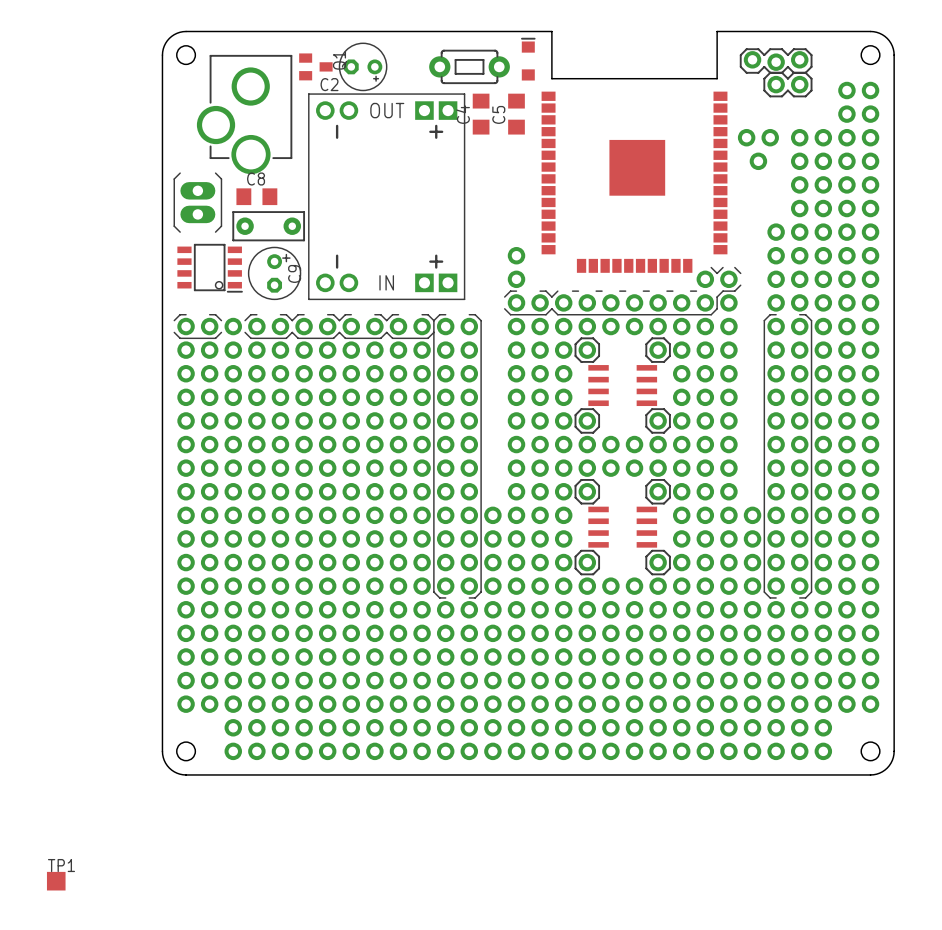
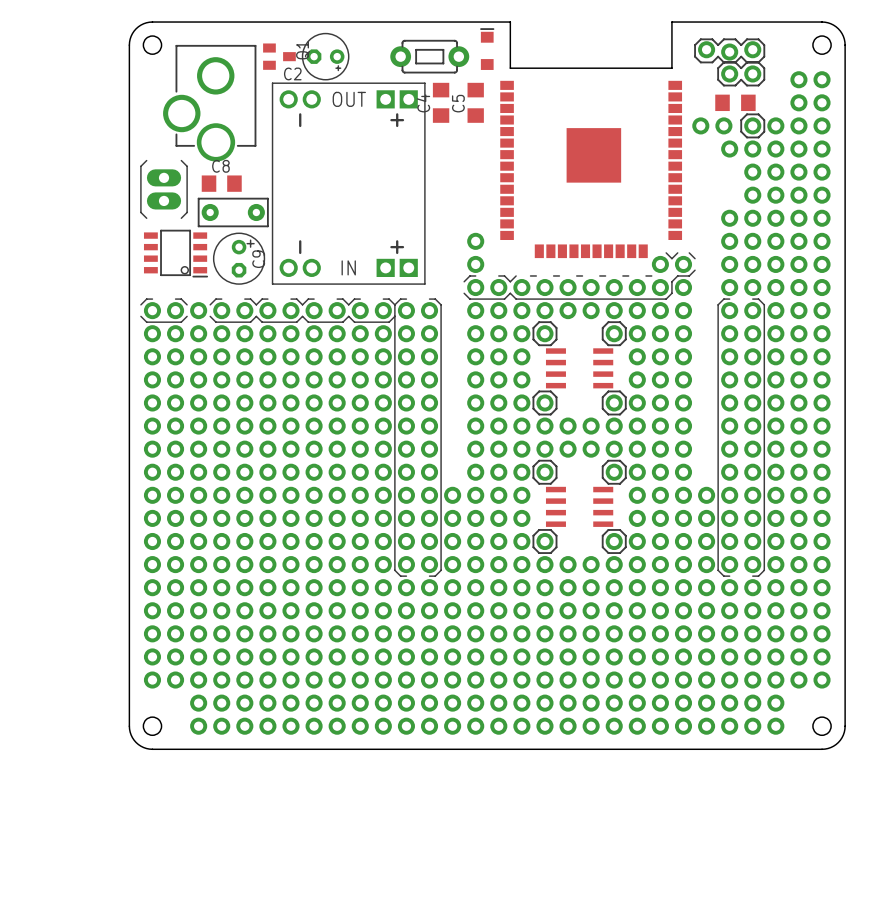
part: none -> (735, 102)
part: none -> (752, 125)
part: (758, 161) -> none
part: none -> (741, 149)
part: (799, 173) -> none
TP1: (56, 881) -> none

